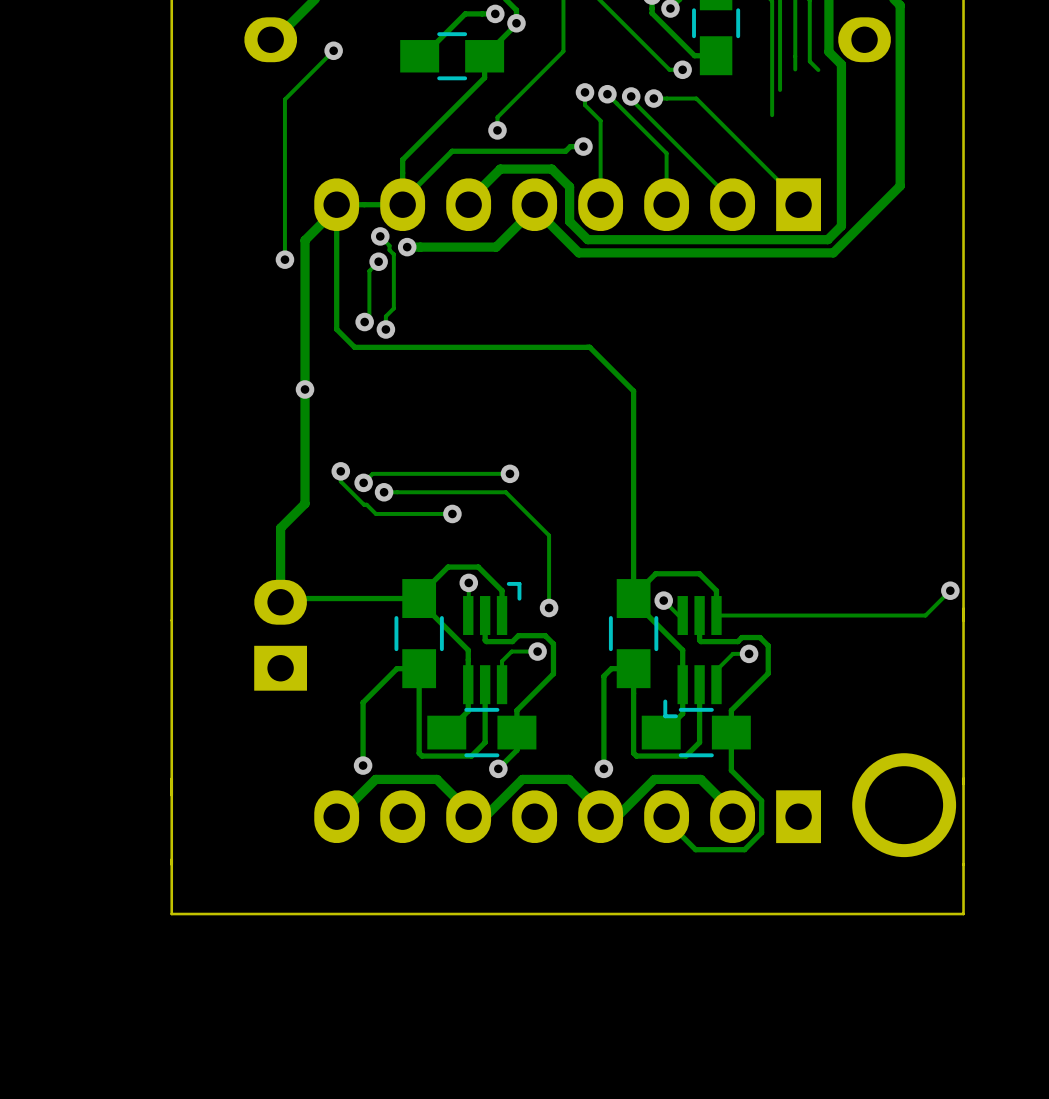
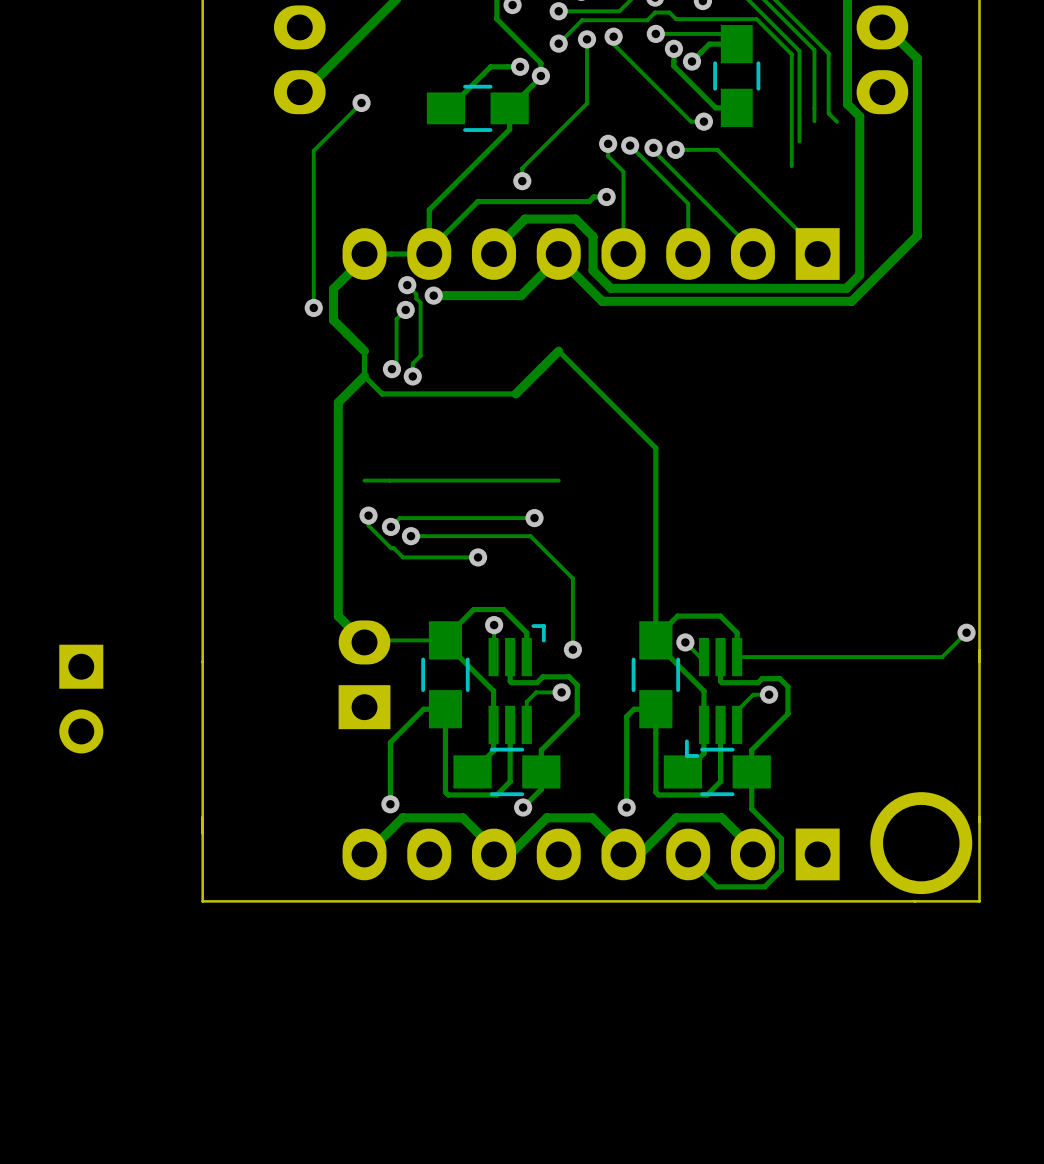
track: (336, 204) (336, 303) -> (333, 320) (364, 351)
track: (305, 272) (305, 503) (280, 528) (280, 602) (284, 598) (419, 598) -> none
track: none -> (364, 376) (338, 402) (338, 616) (364, 642) (366, 640)
track: (490, 347) (589, 347) (633, 391) (633, 402) -> (515, 393) (558, 351) (655, 448)
via: (305, 389) -> none
track: none -> (558, 480) (364, 480)
part position: (280, 635) -> (364, 674)
part: none -> (81, 699)
board edge: (963, 864) (963, 914) (171, 914) (171, 864) -> (979, 901) (202, 901)

